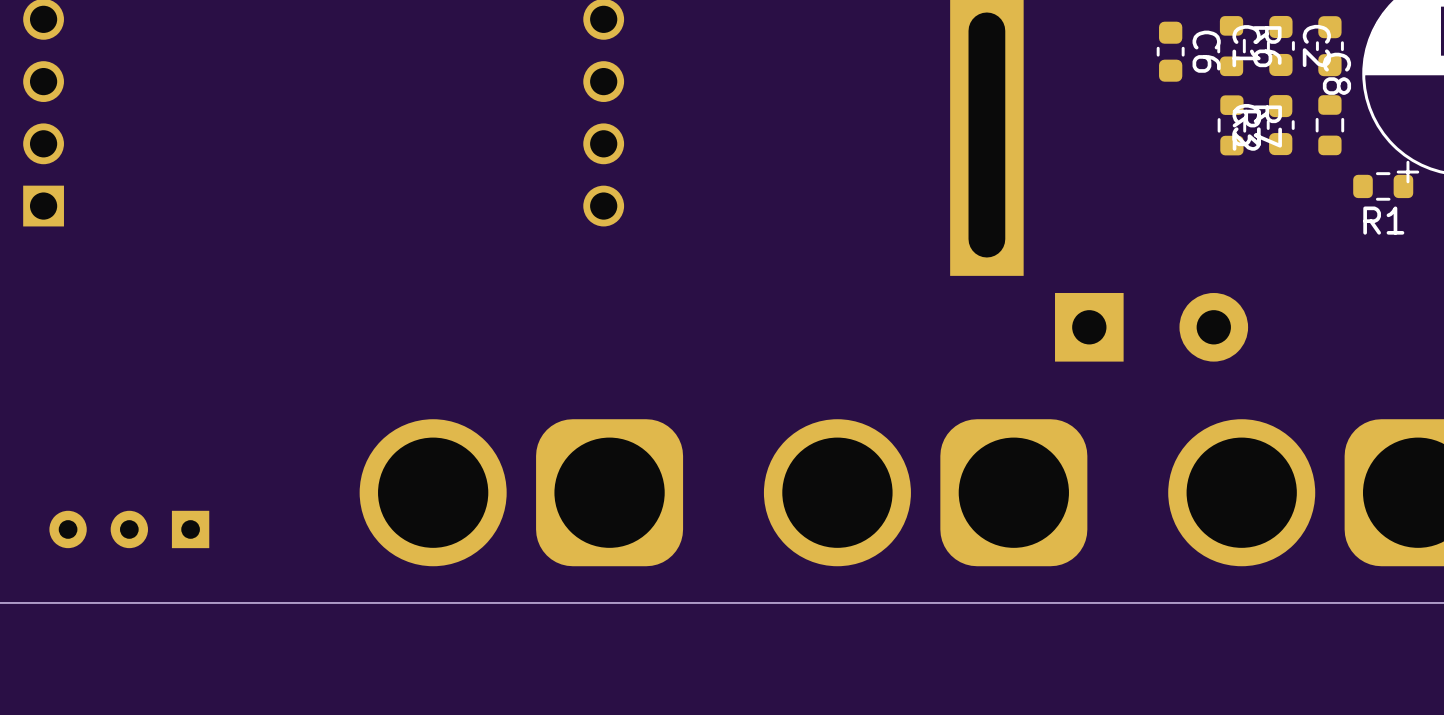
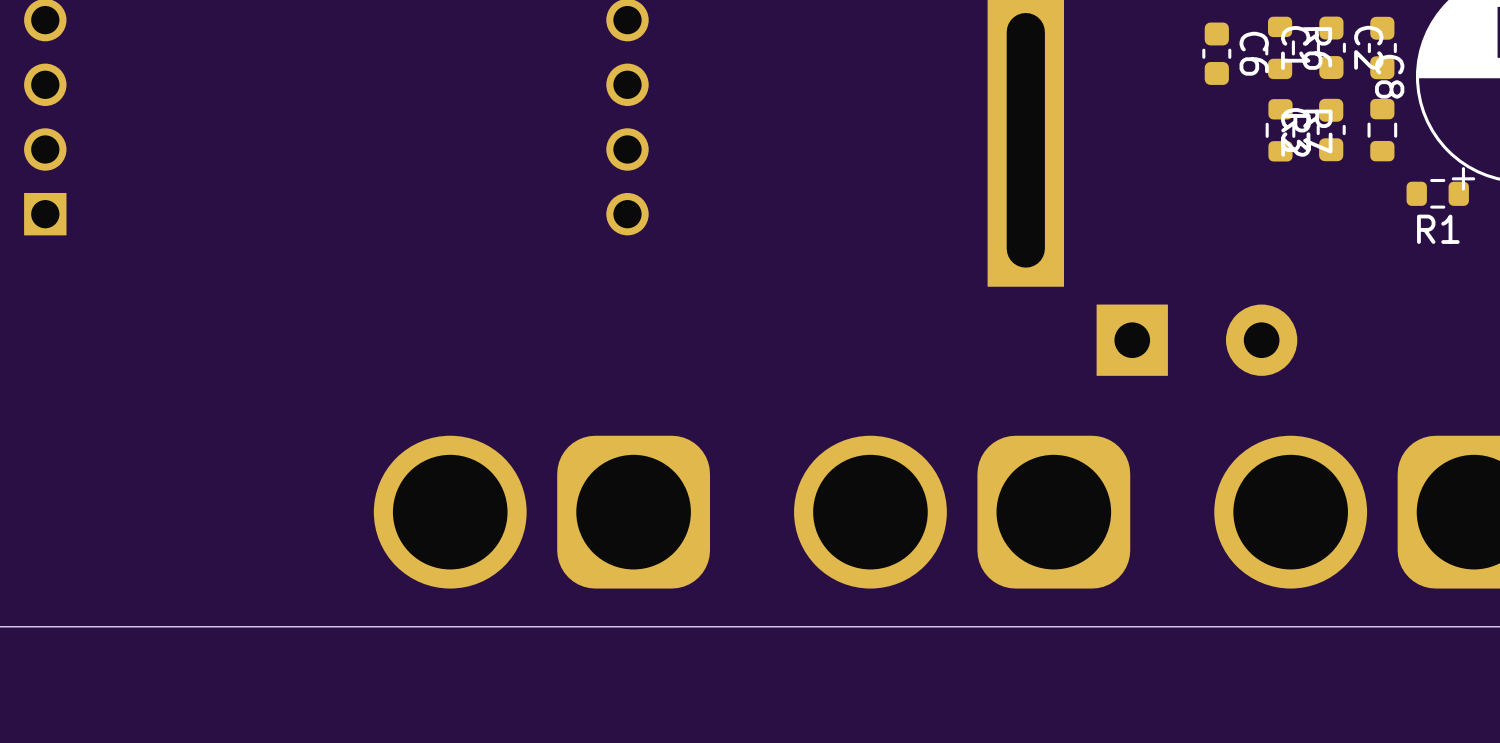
part: (129, 529) -> none

